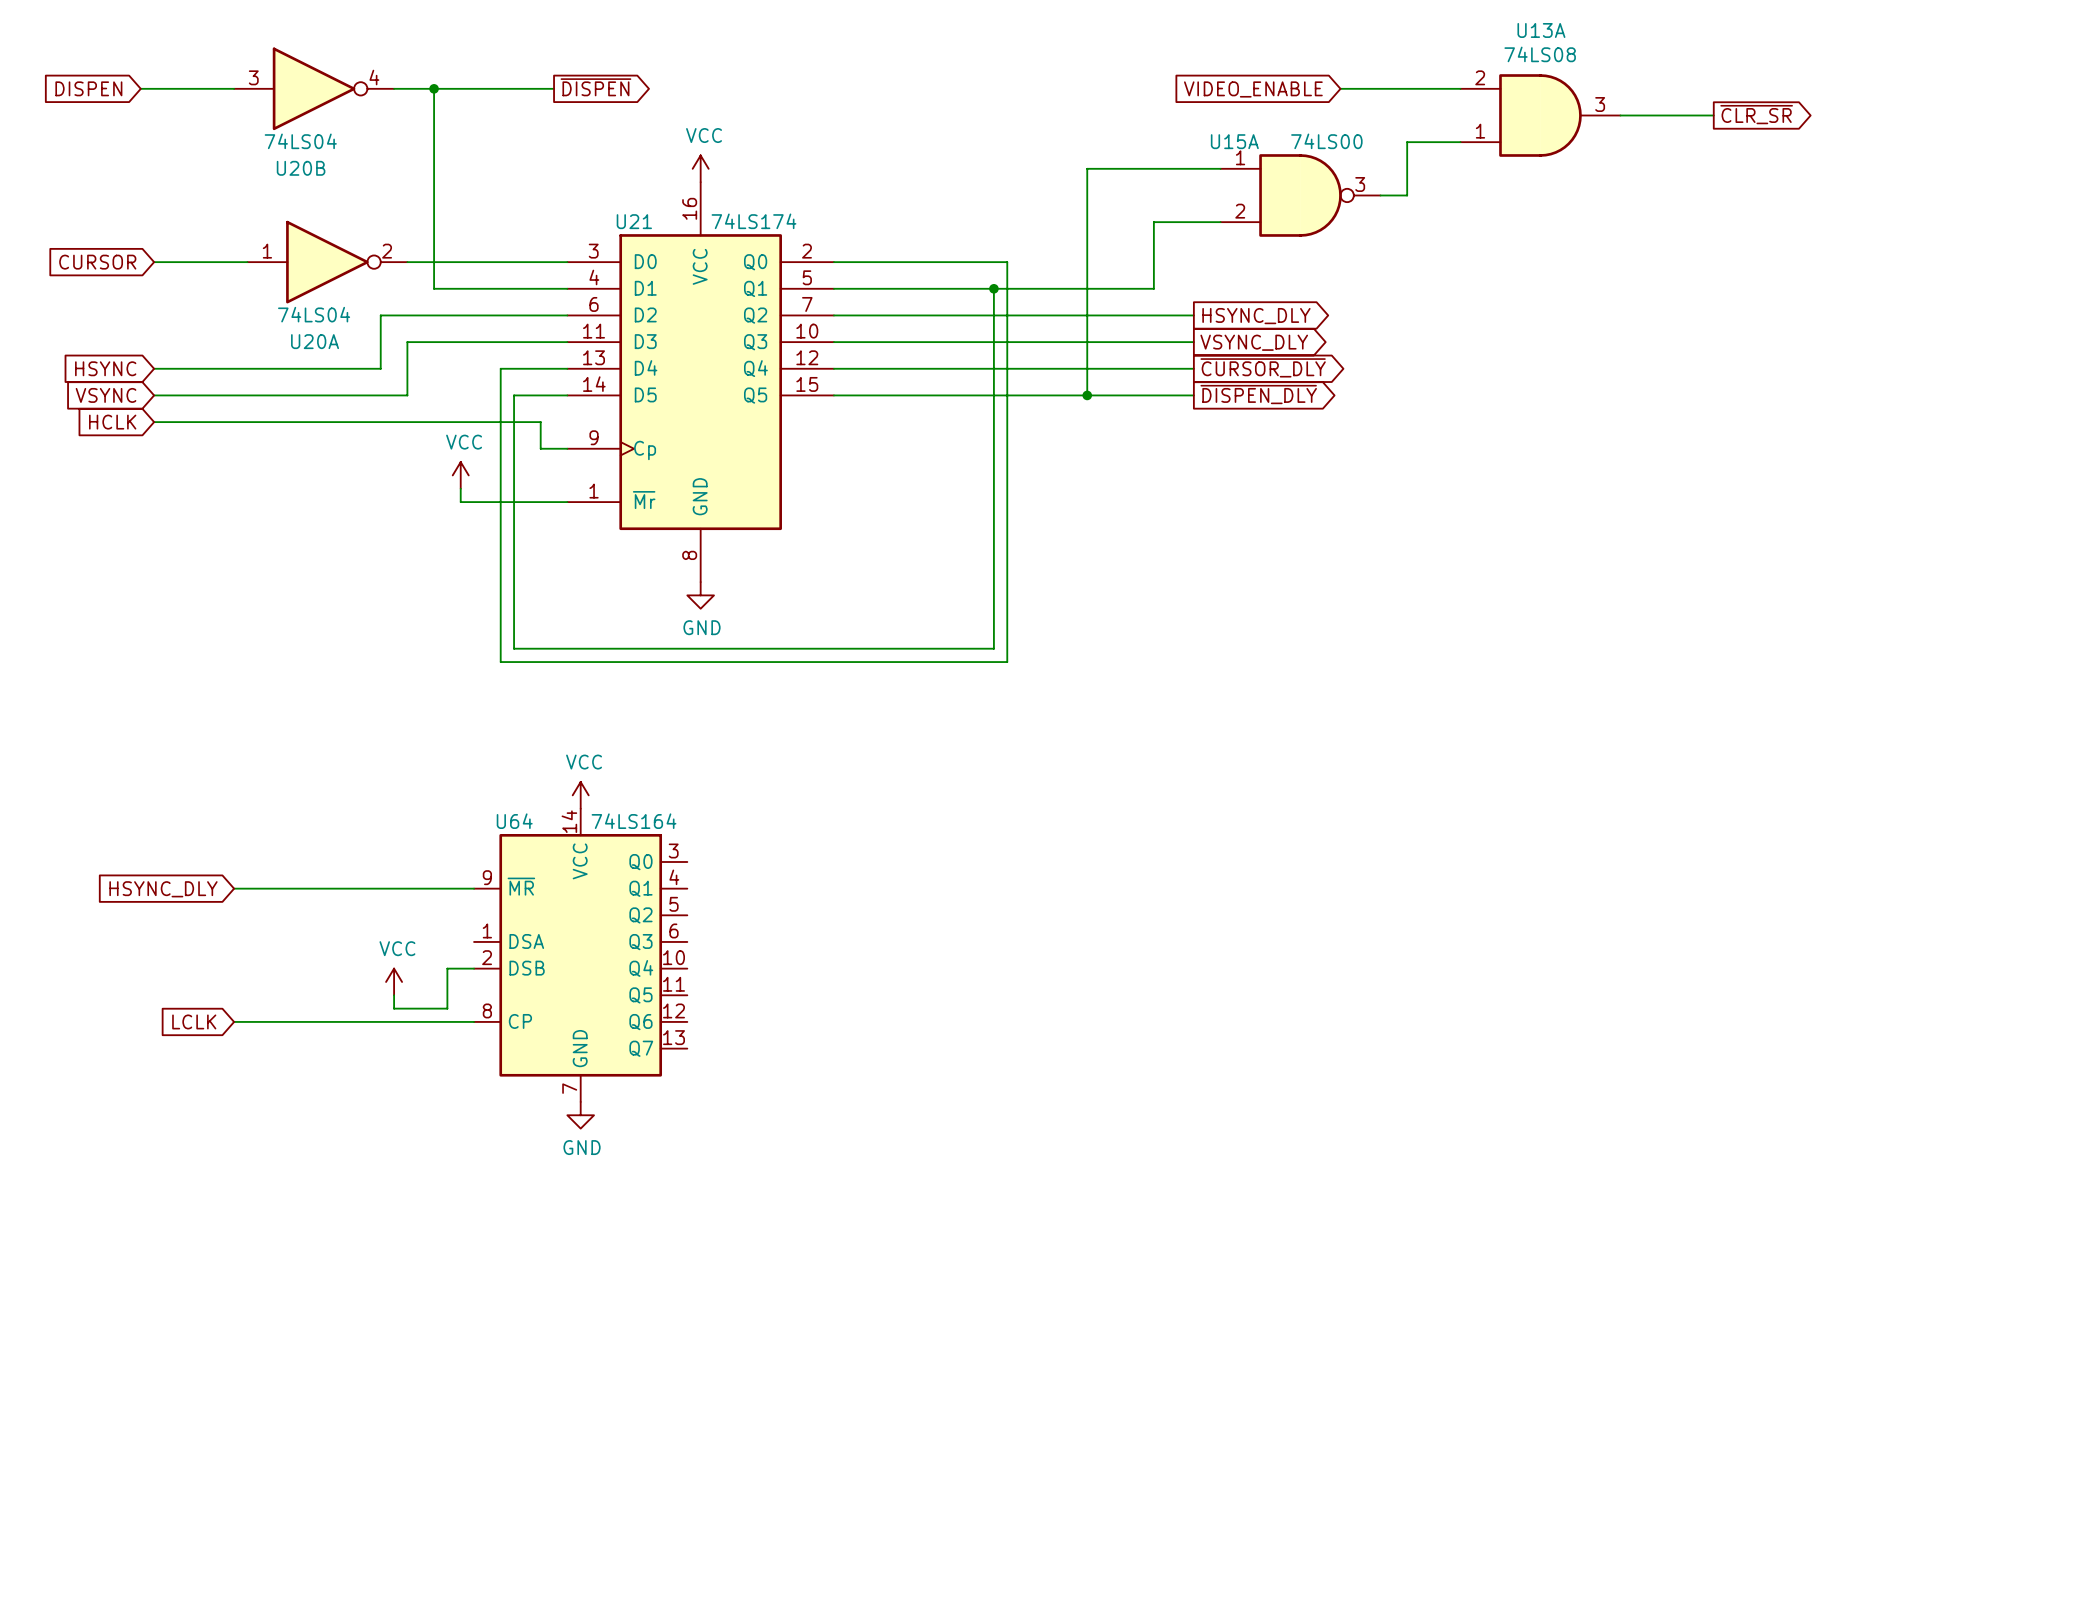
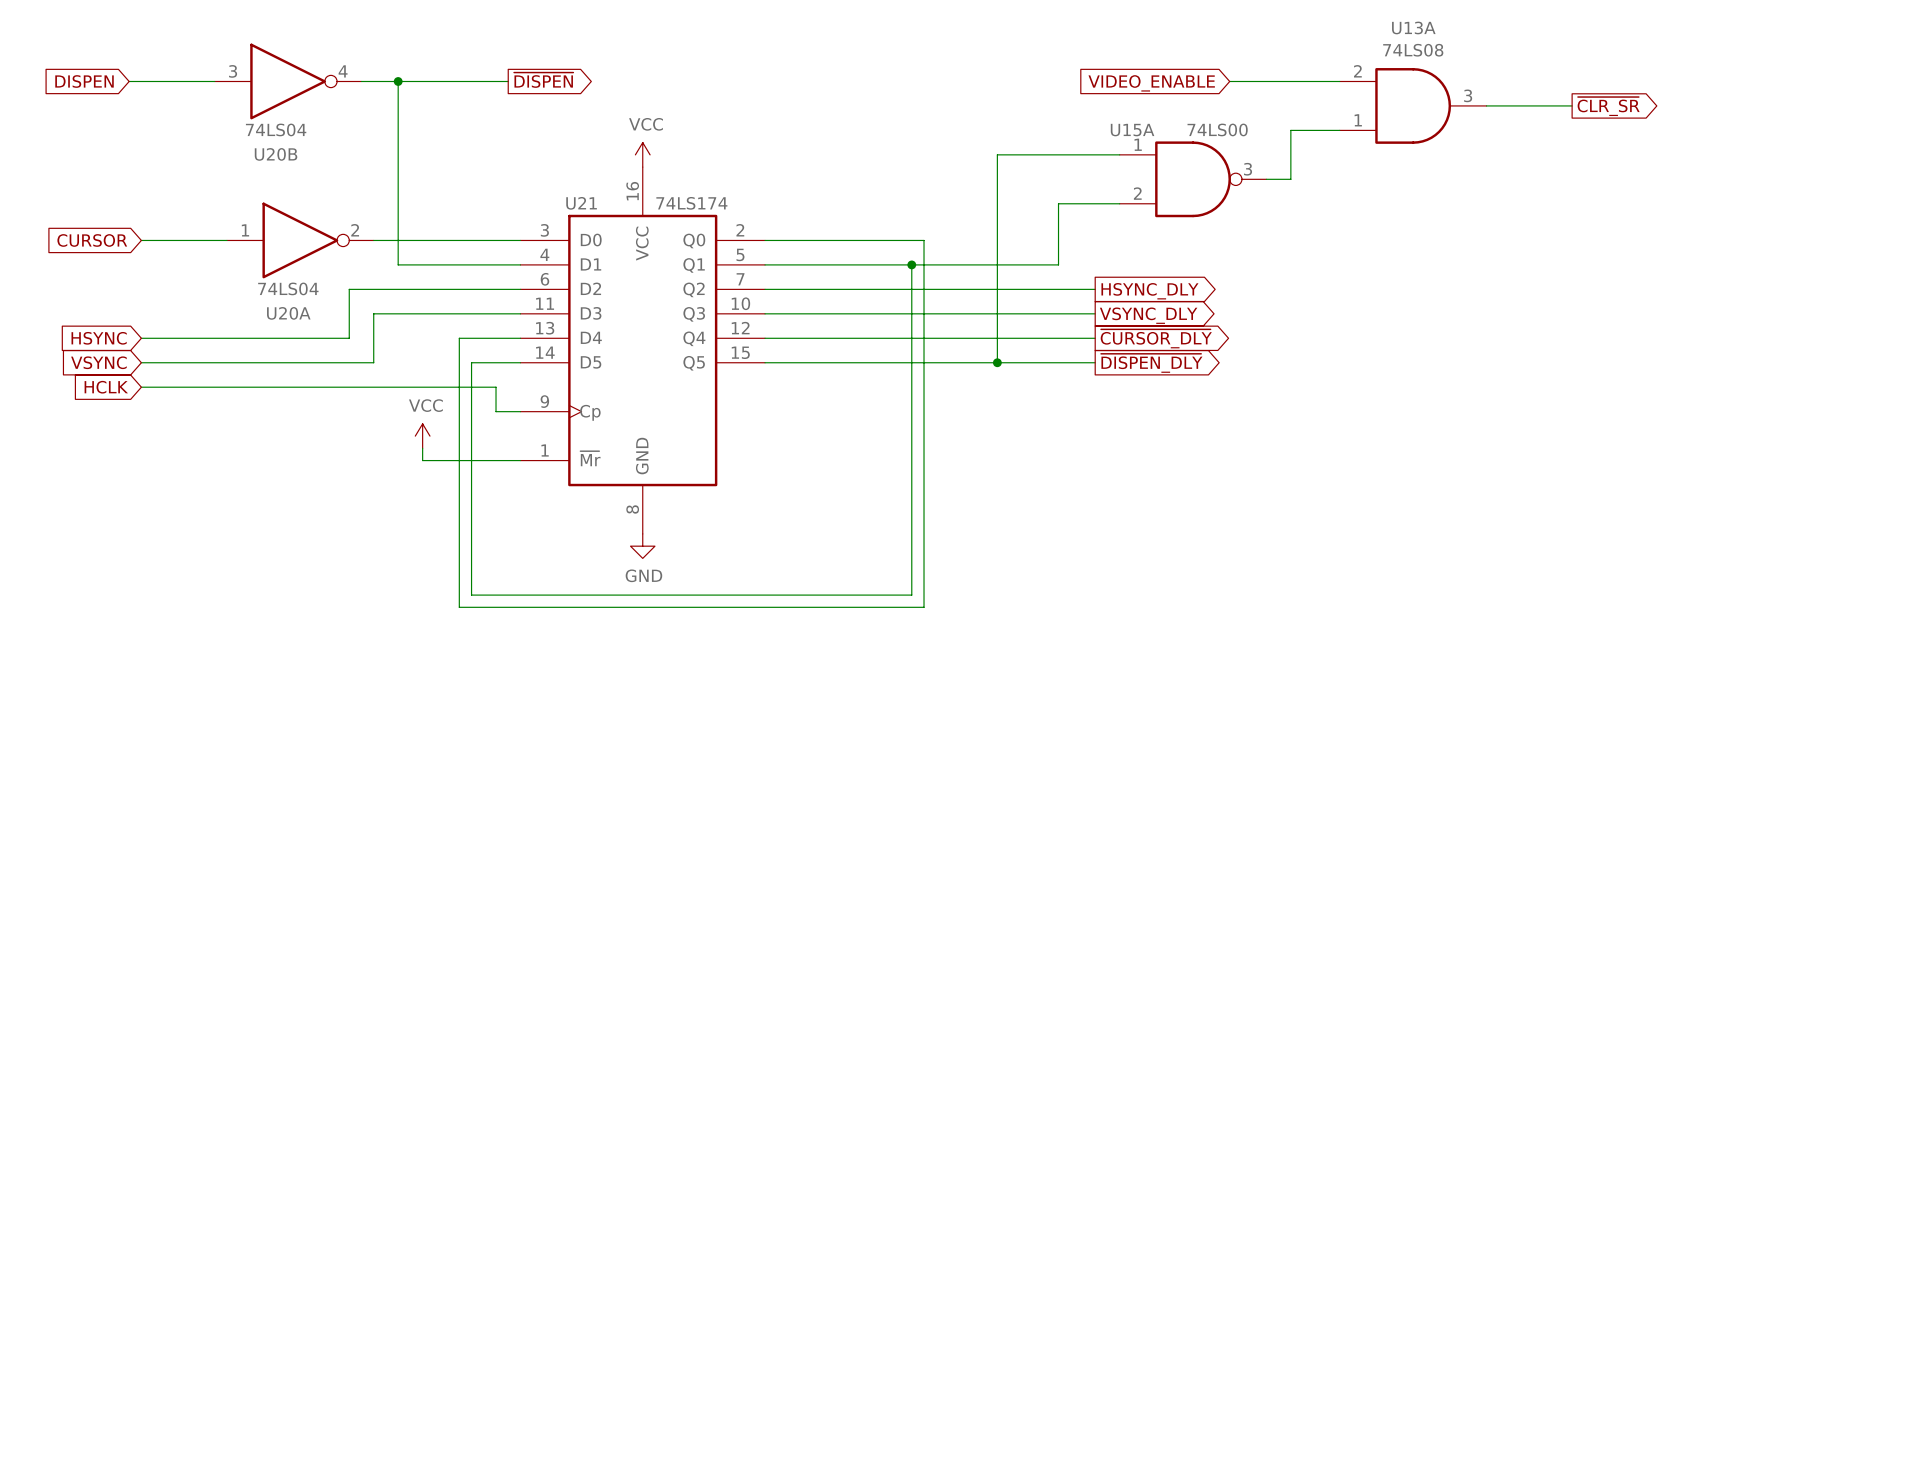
power symbol: VCC (580, 795) -> none
wire: (234, 888) (474, 888) -> none
global label: HSYNC_DLY (163, 889) -> none
U64: 74LS164 (580, 955) -> none
wire: (474, 968) (447, 968) (447, 1008) (394, 1008) (394, 995) -> none
power symbol: VCC (394, 981) -> none
global label: LCLK (194, 1021) -> none
wire: (234, 1021) (474, 1021) -> none
power symbol: GND (580, 1115) -> none

